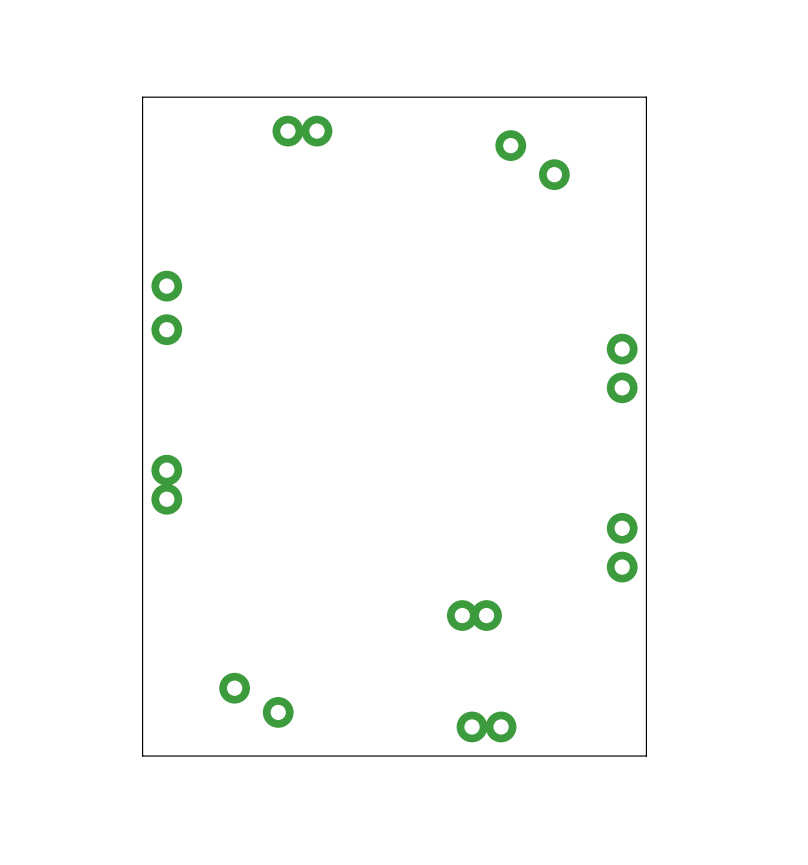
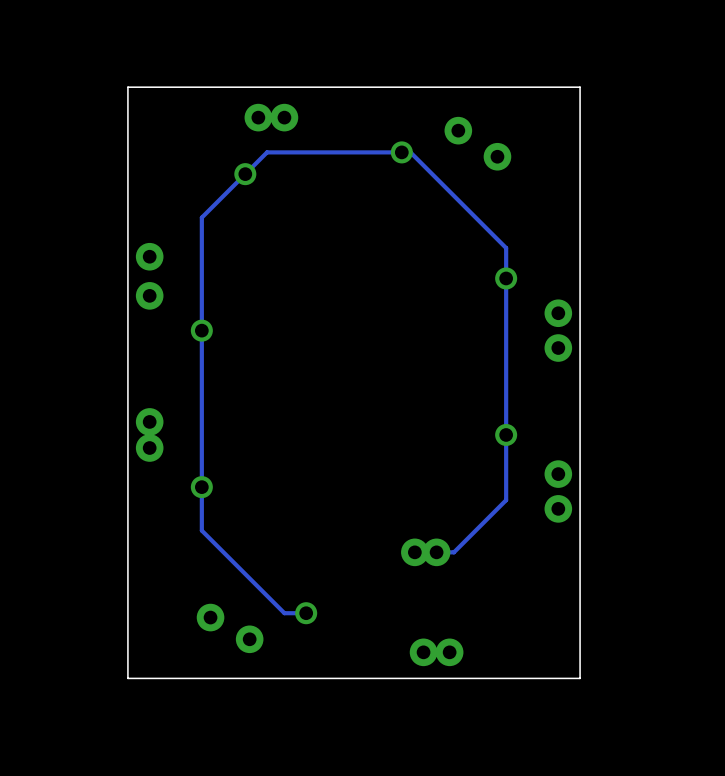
via: none -> (401, 152)
via: none -> (245, 174)
via: none -> (506, 278)
via: none -> (201, 330)
via: none -> (506, 434)
via: none -> (201, 487)
track: none -> (436, 552) (453, 552) (506, 500) (506, 248) (410, 152) (267, 152) (201, 217) (201, 530) (284, 613) (306, 613)
via: none -> (306, 613)

